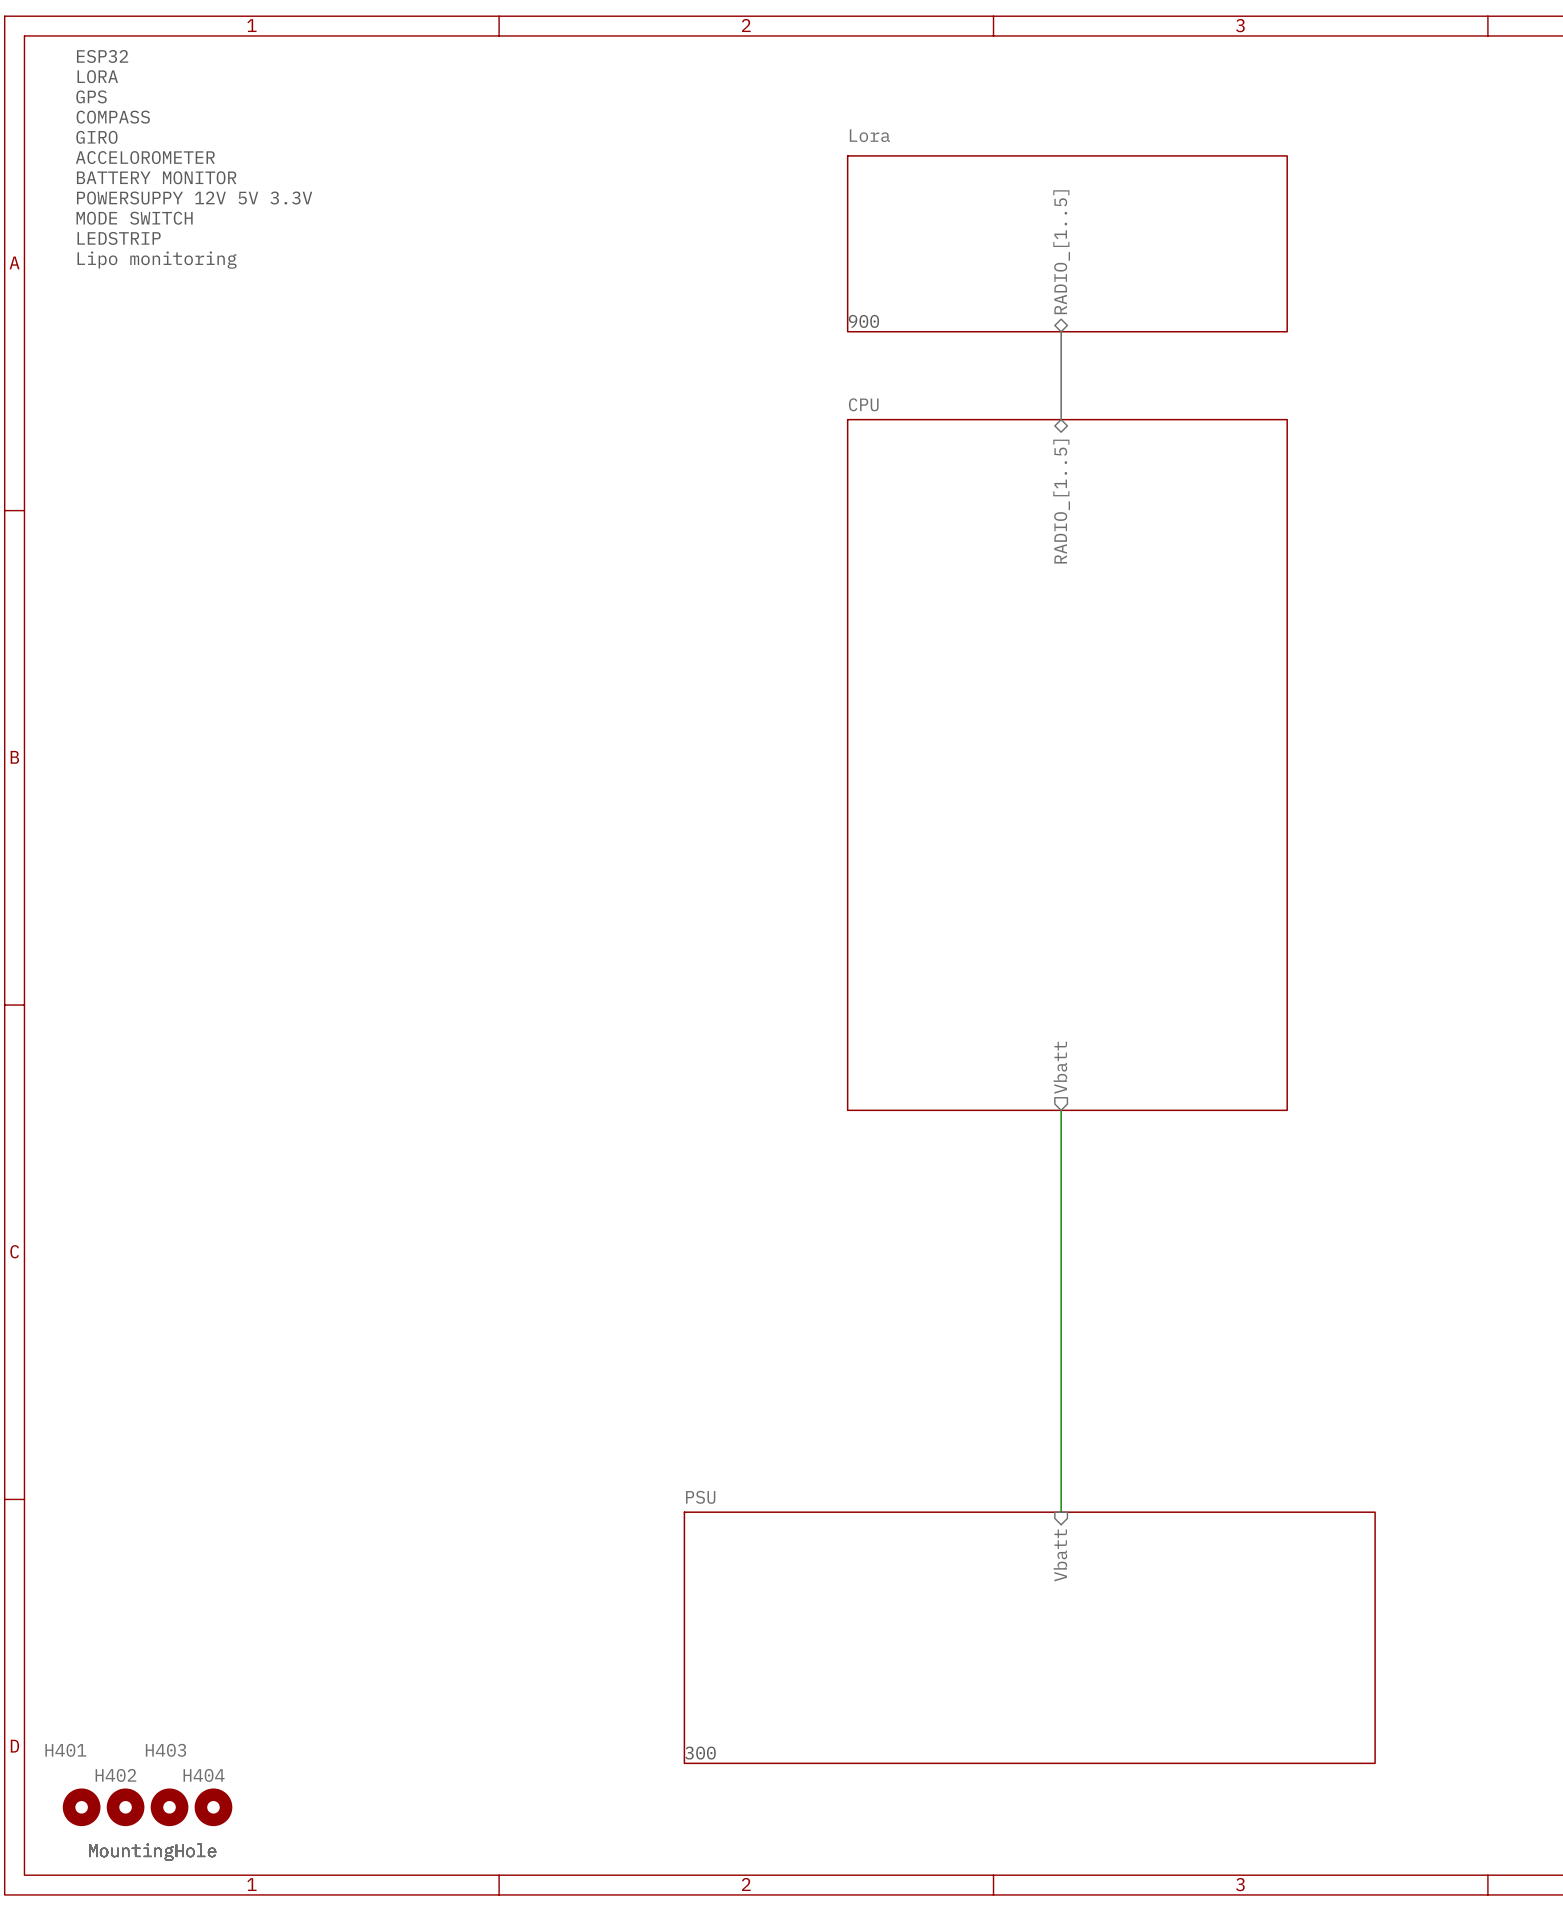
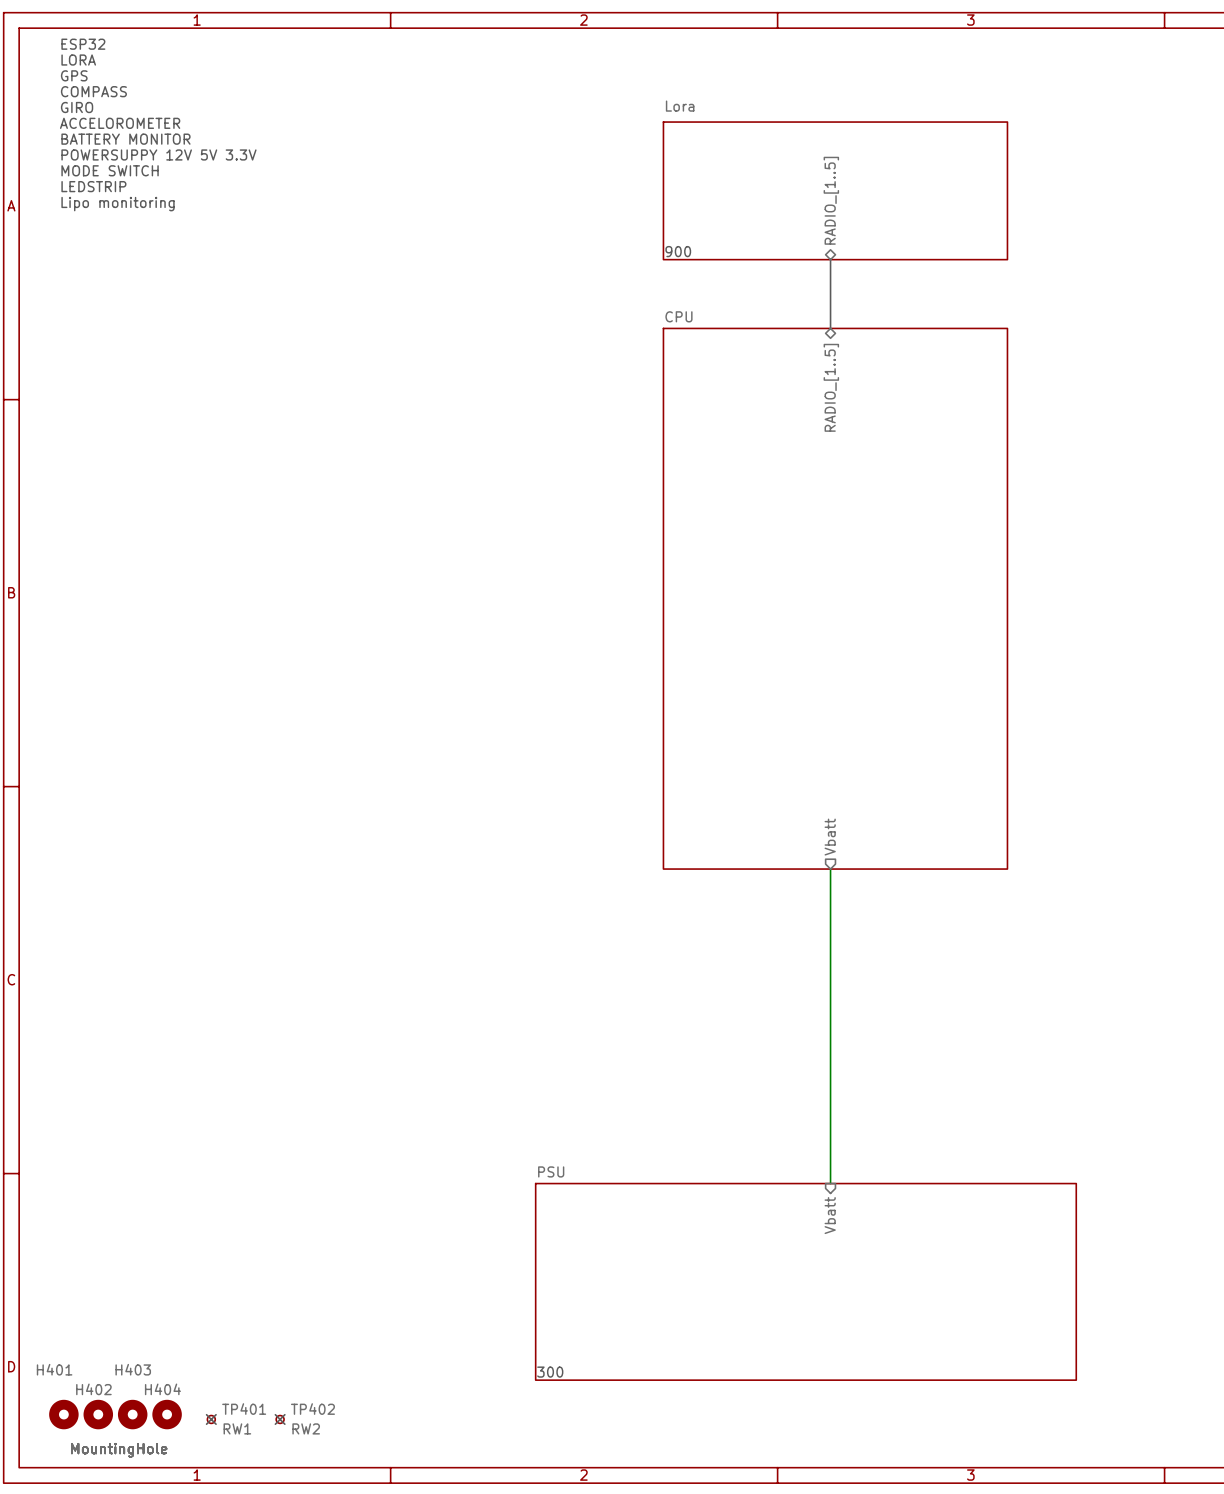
no-connect mark: none -> (211, 1419)
TP401: none -> RW1 (211, 1419)
no-connect mark: none -> (280, 1419)
TP402: none -> RW2 (280, 1419)

